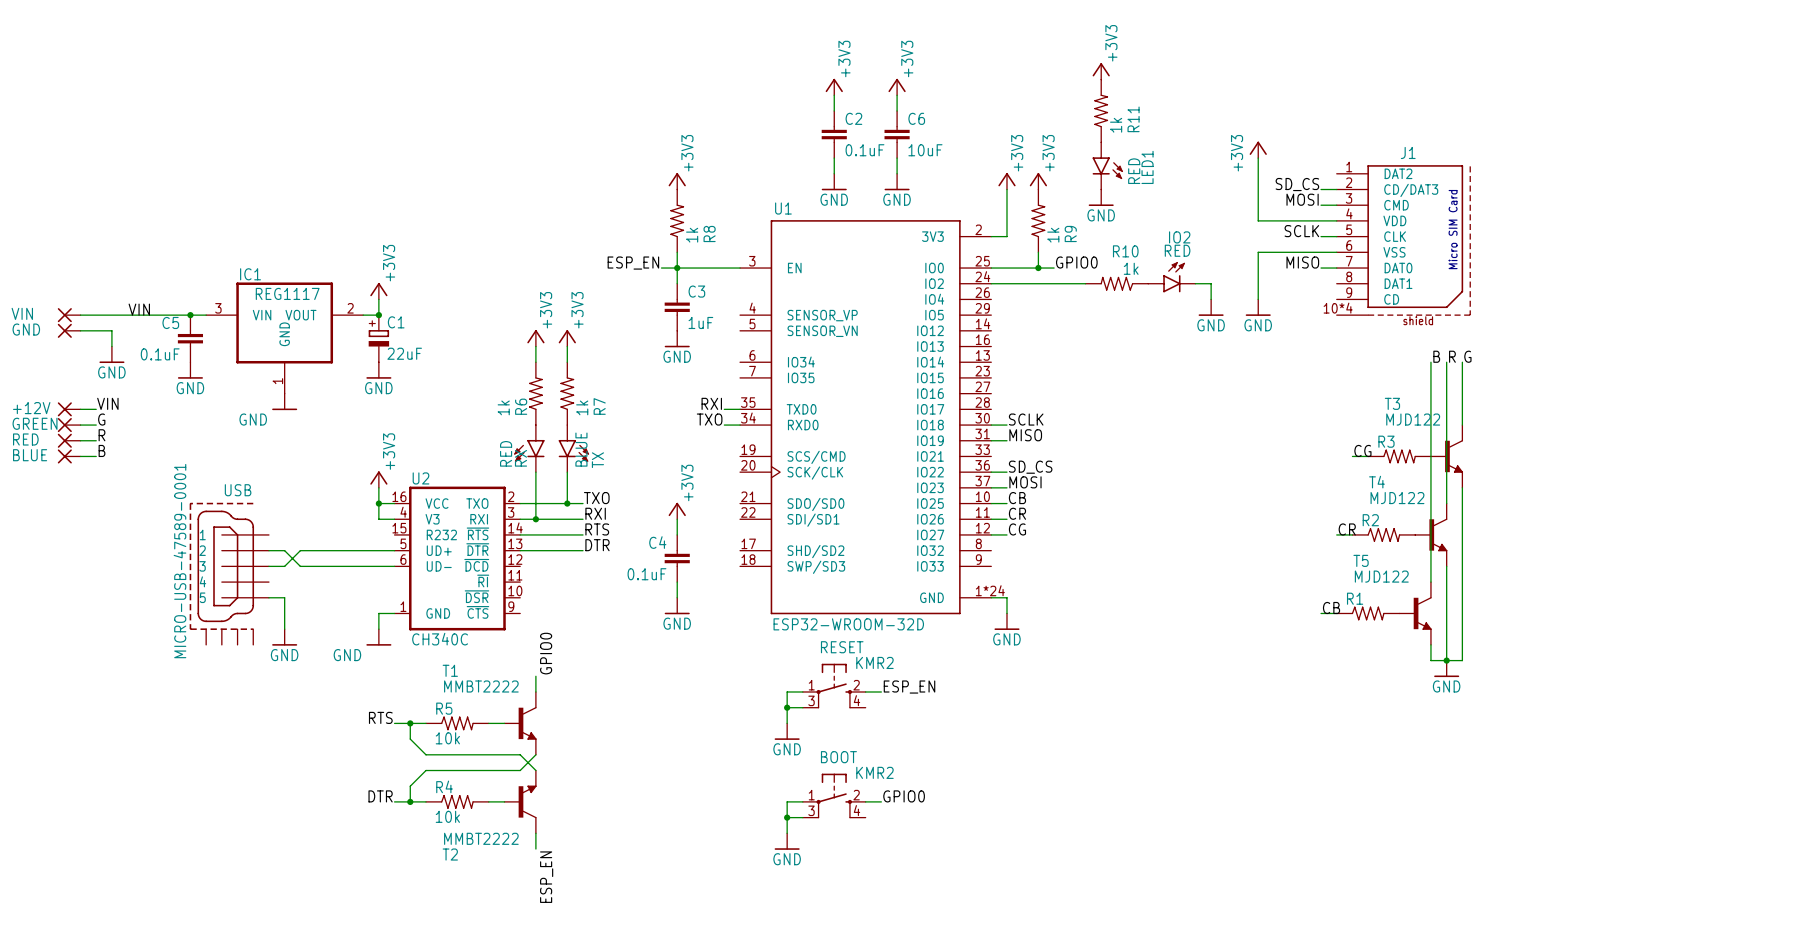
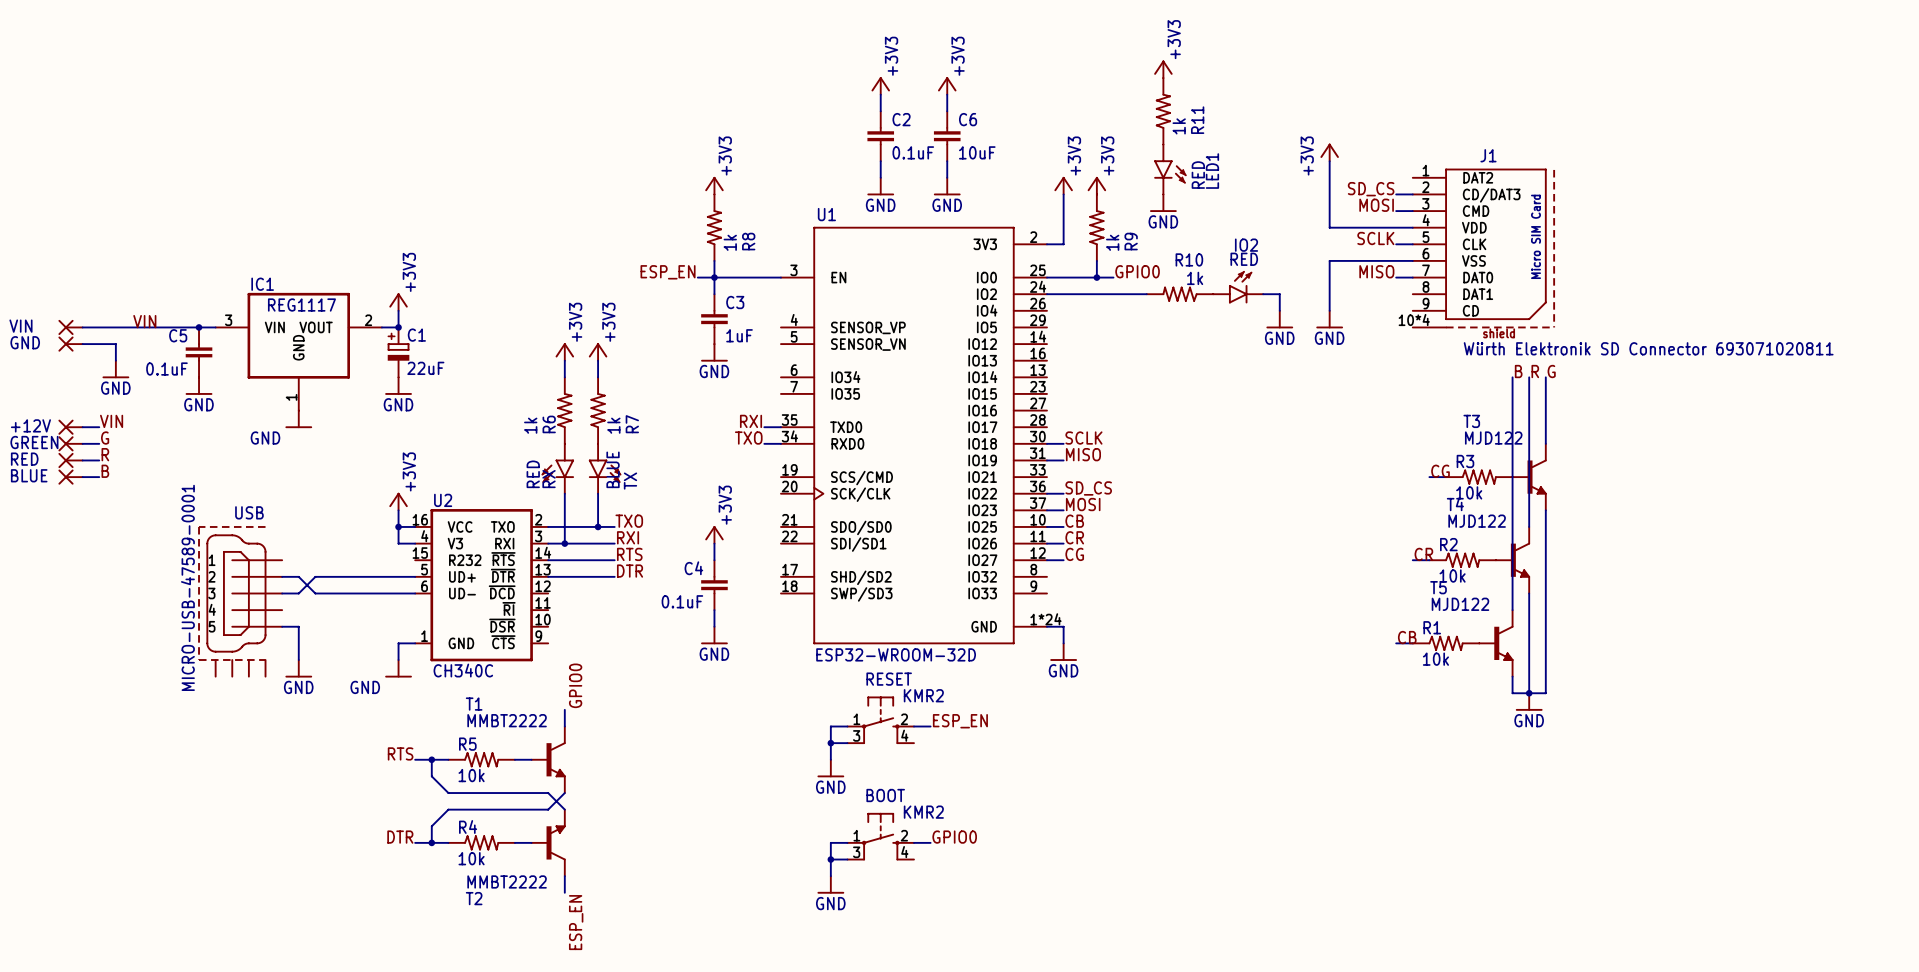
J1 value: none -> Würth Elektronik SD Connector 693071020811 (1648, 348)
R3 value: none -> 10k (1469, 492)
R2 value: none -> 10k (1452, 576)
R1 value: none -> 10k (1435, 659)

